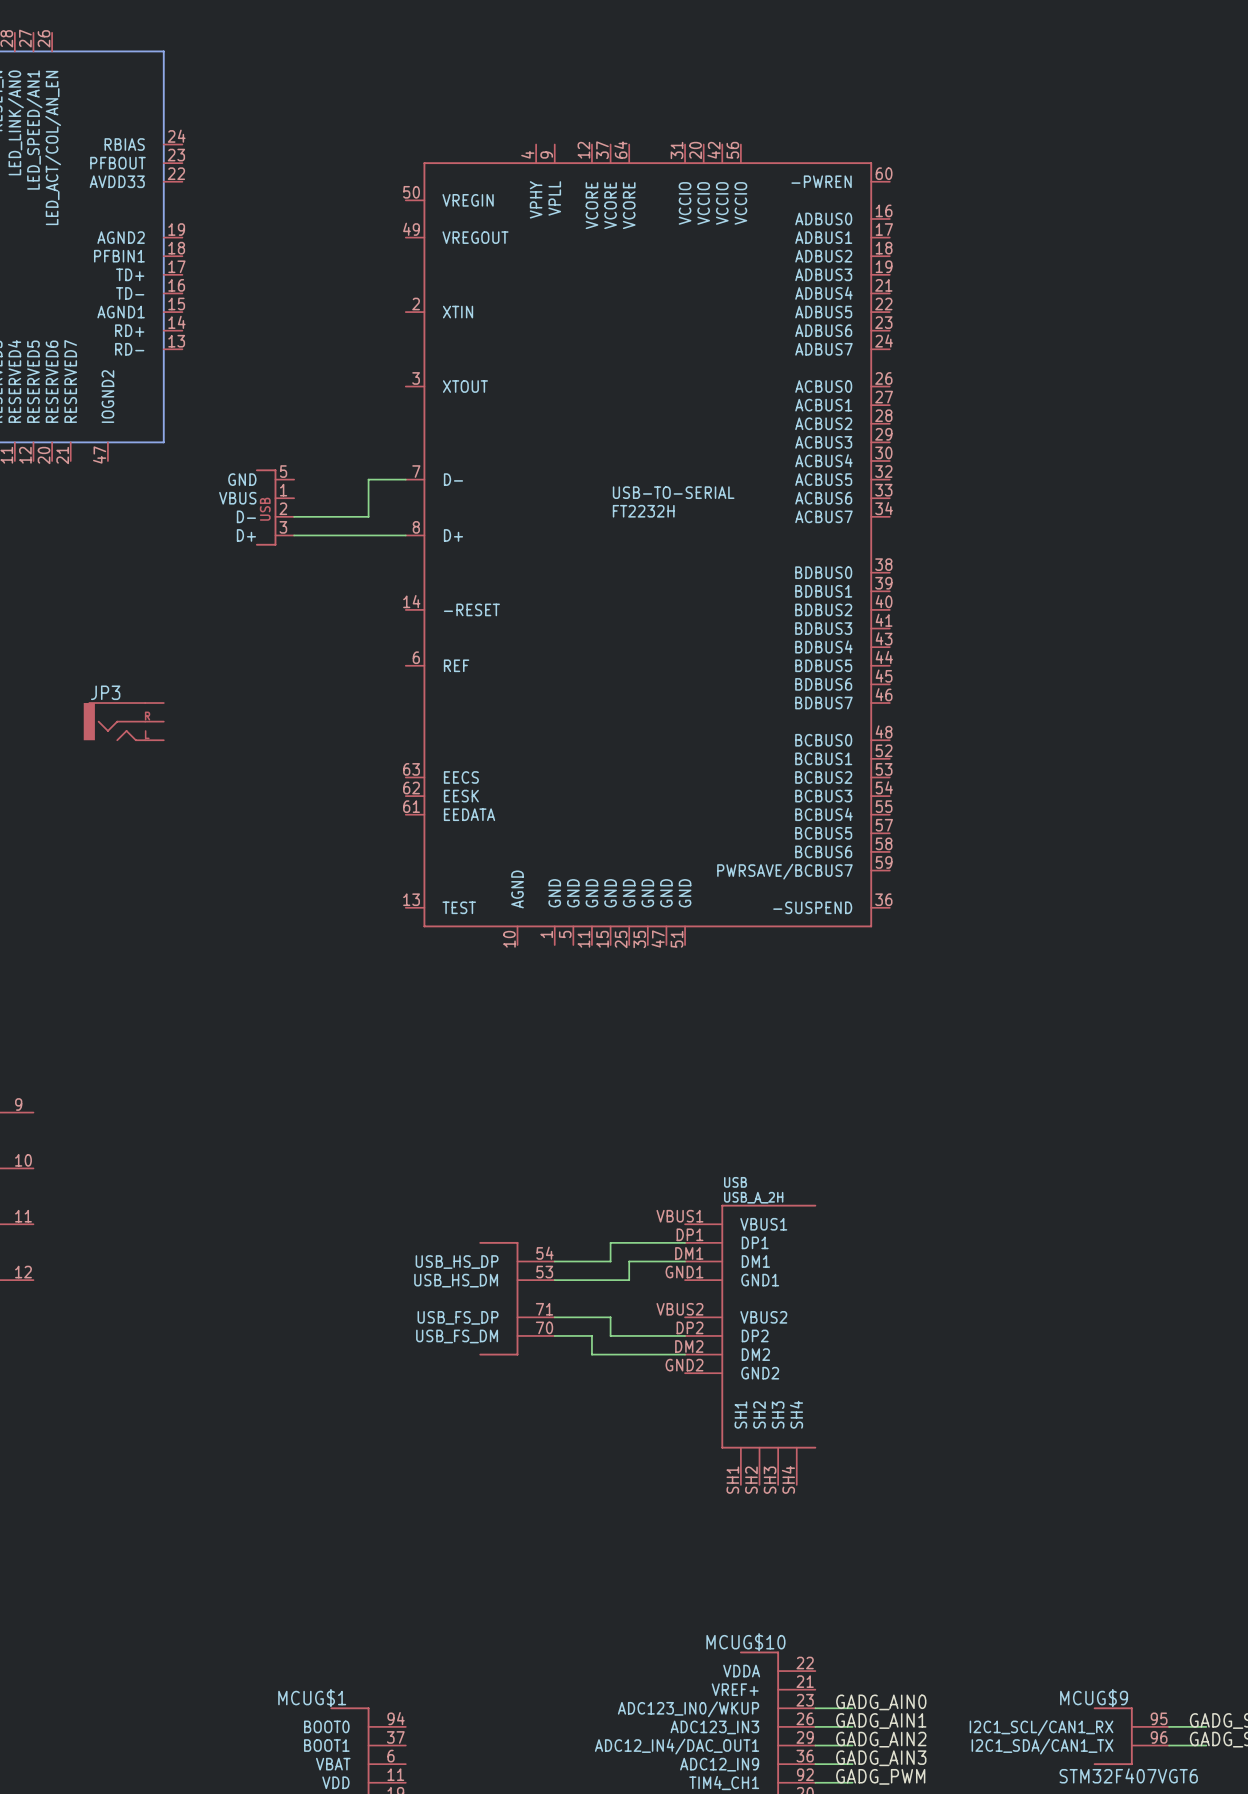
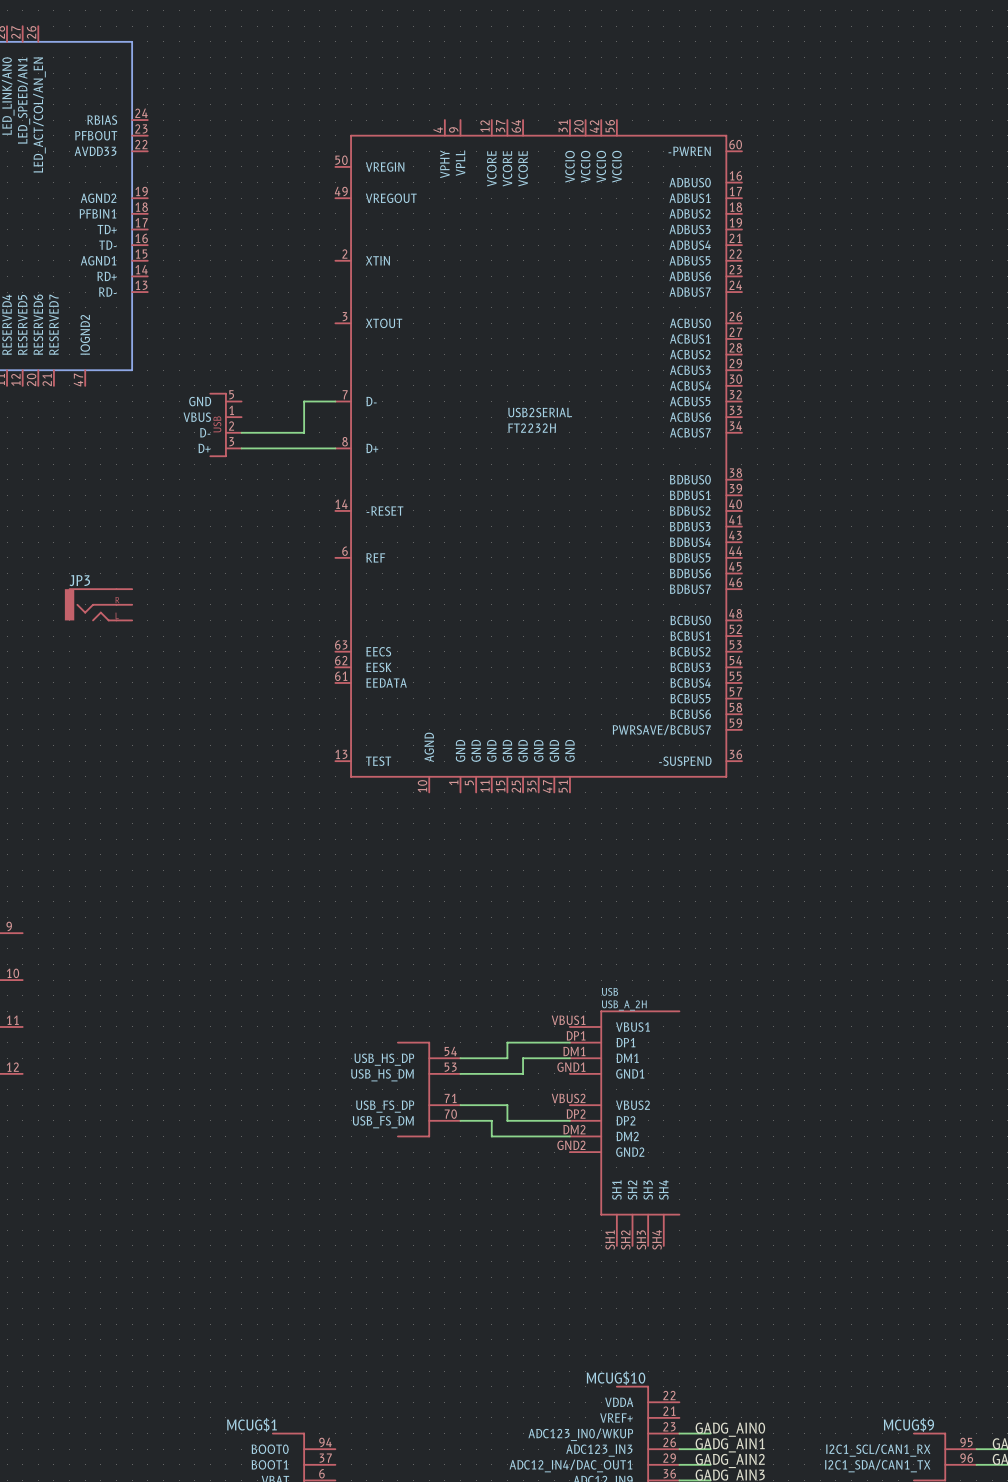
USB-TO-SERIAL name: USB-TO-SERIAL (673, 492) -> USB2SERIAL (540, 412)

